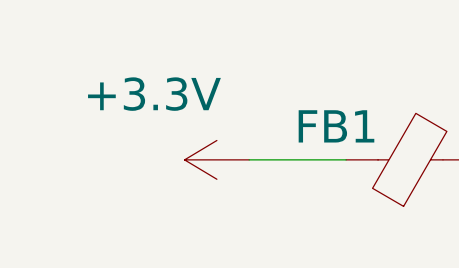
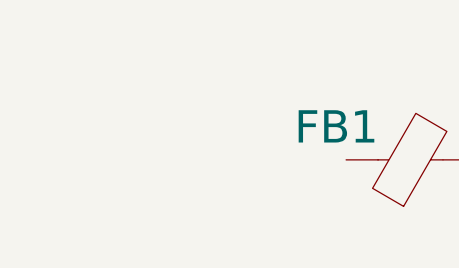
power symbol: +3.3V (216, 159) -> none
wire: (249, 159) (346, 159) -> none

